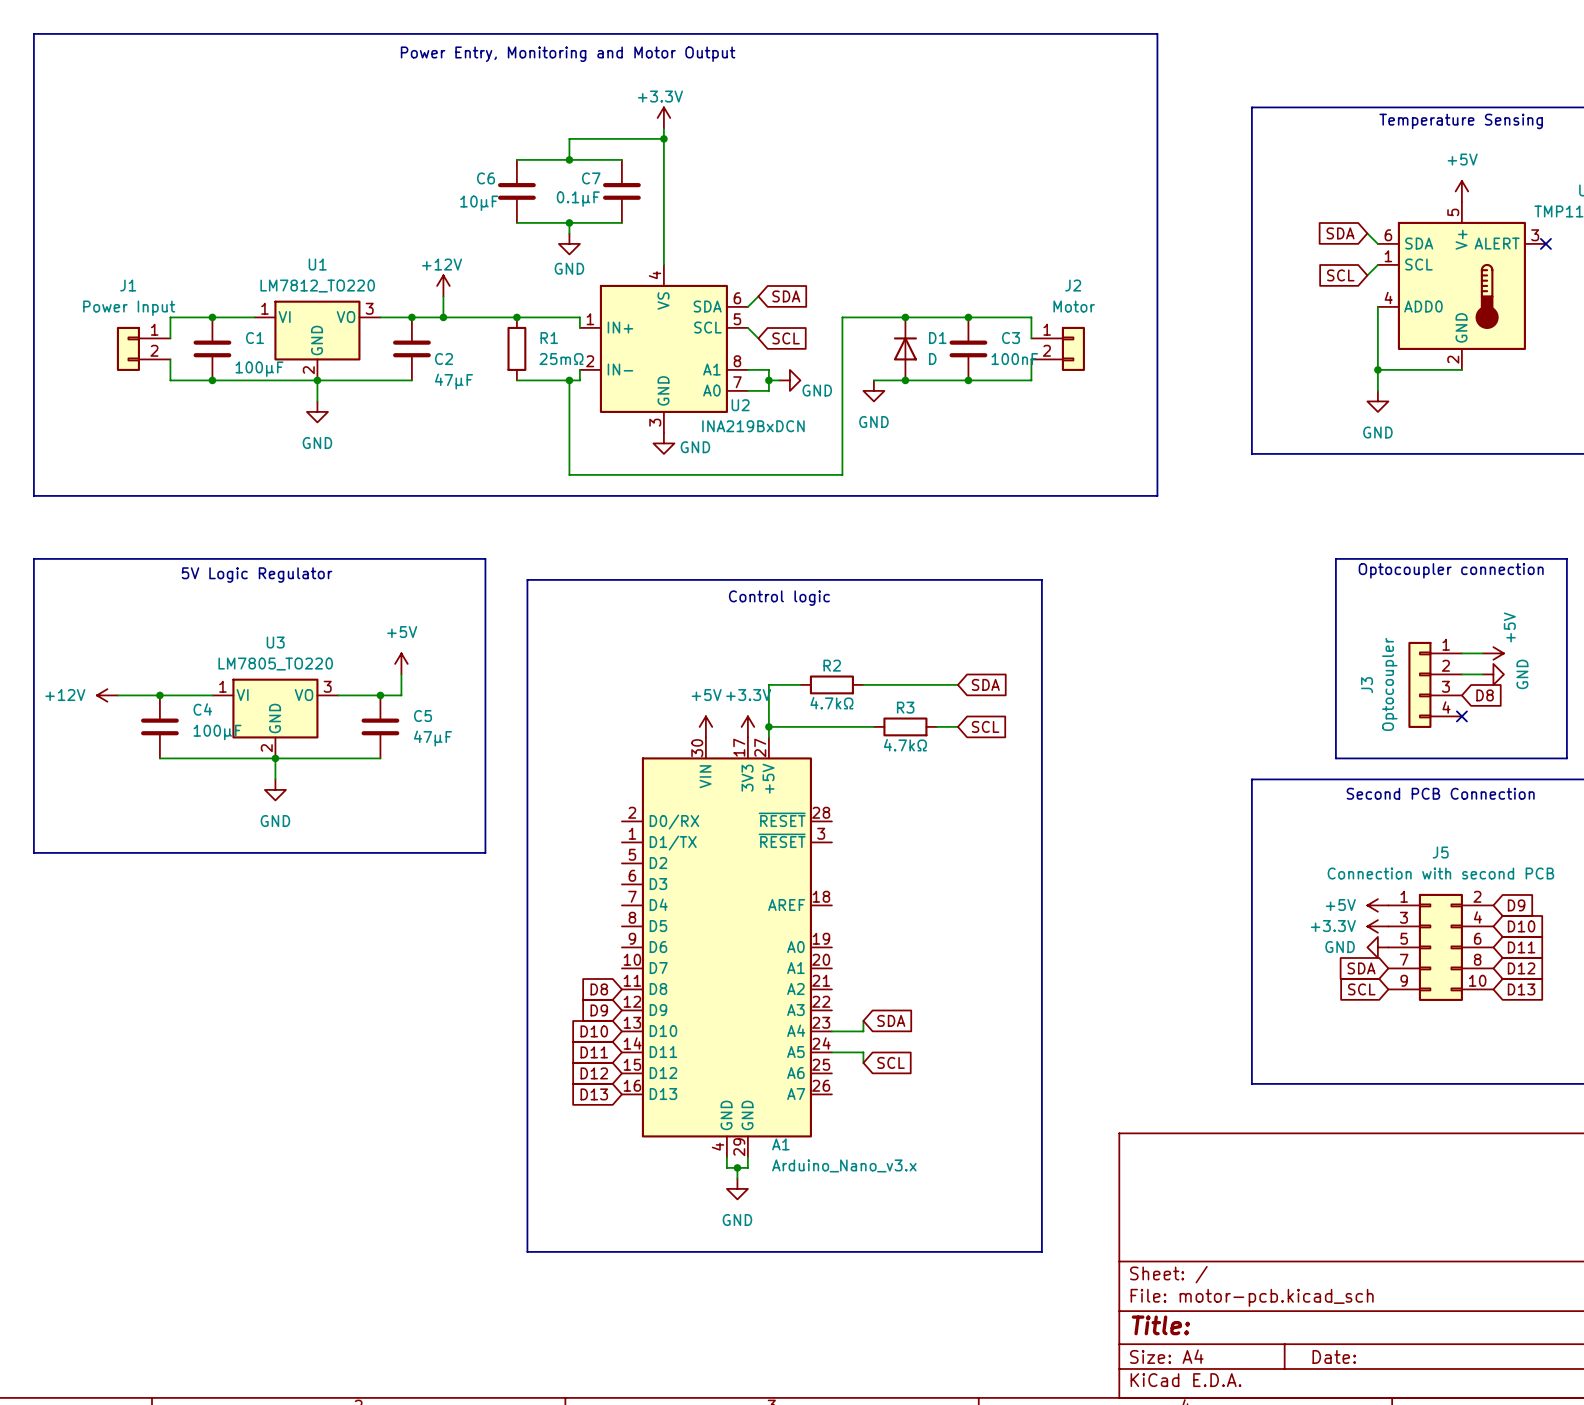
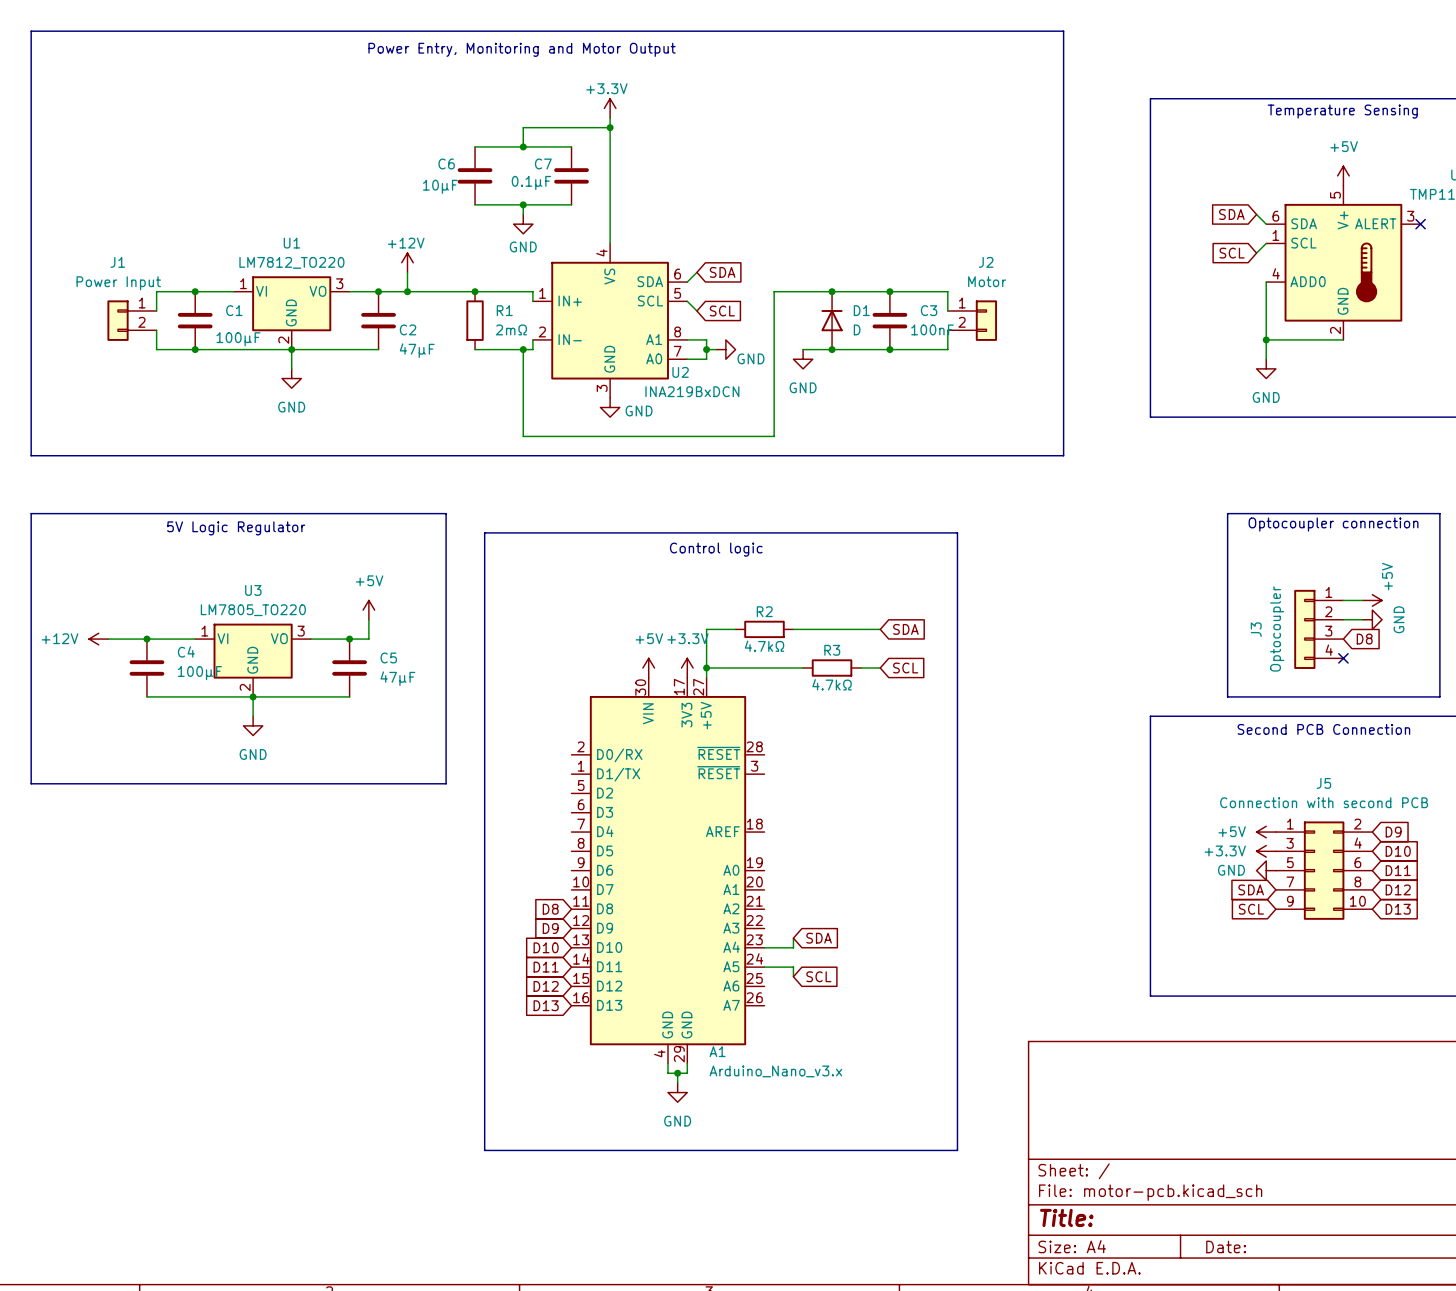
R1 value: 25mΩ (561, 359) -> 2mΩ (511, 329)

